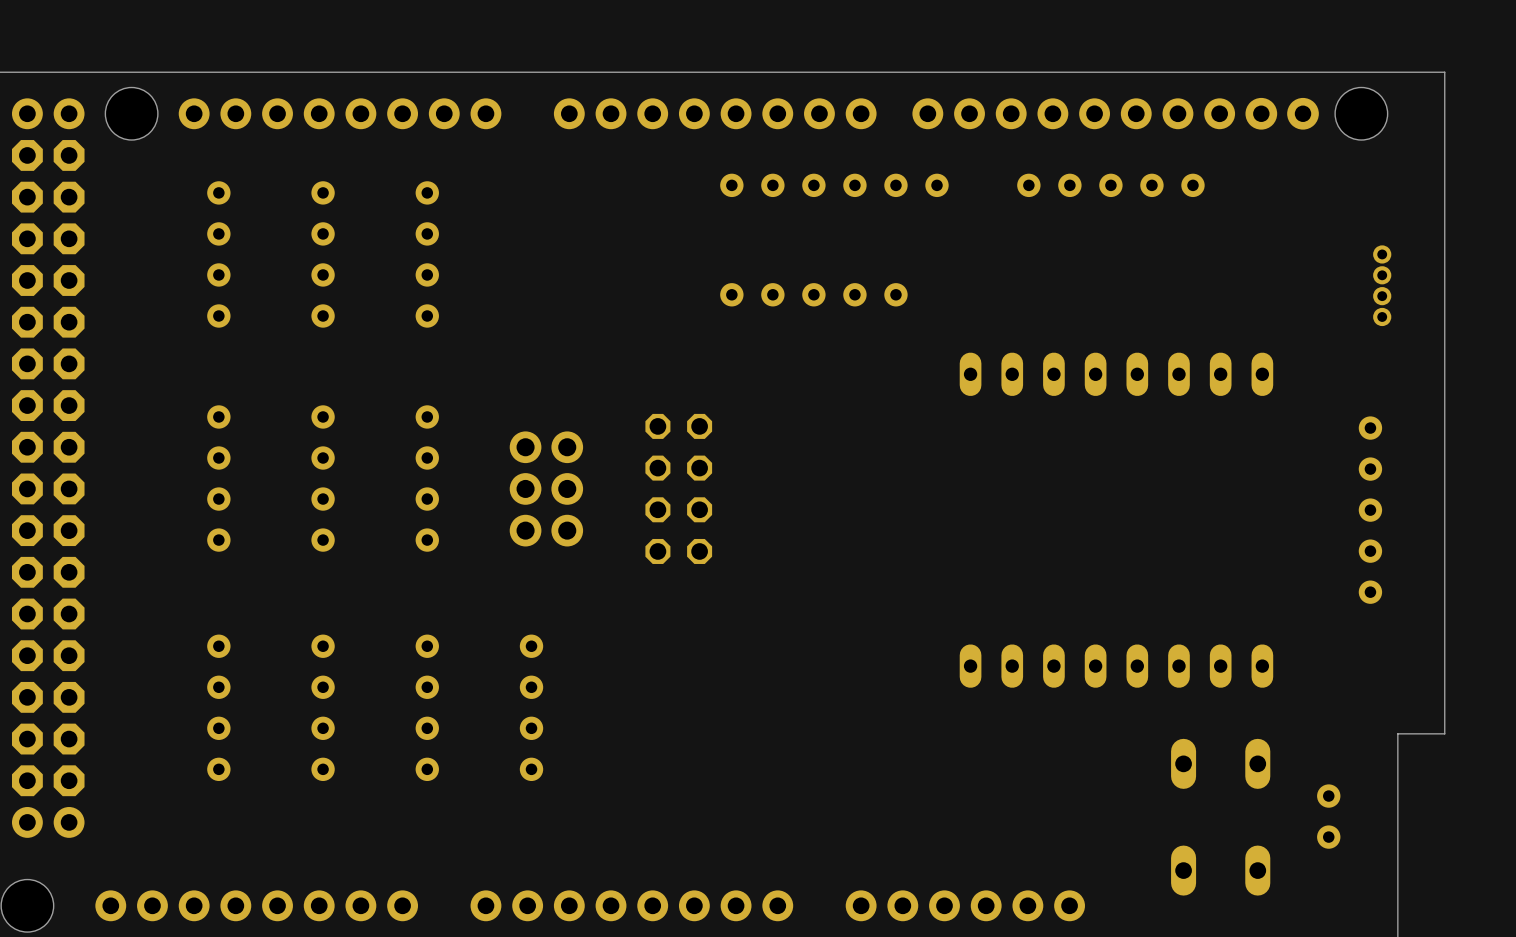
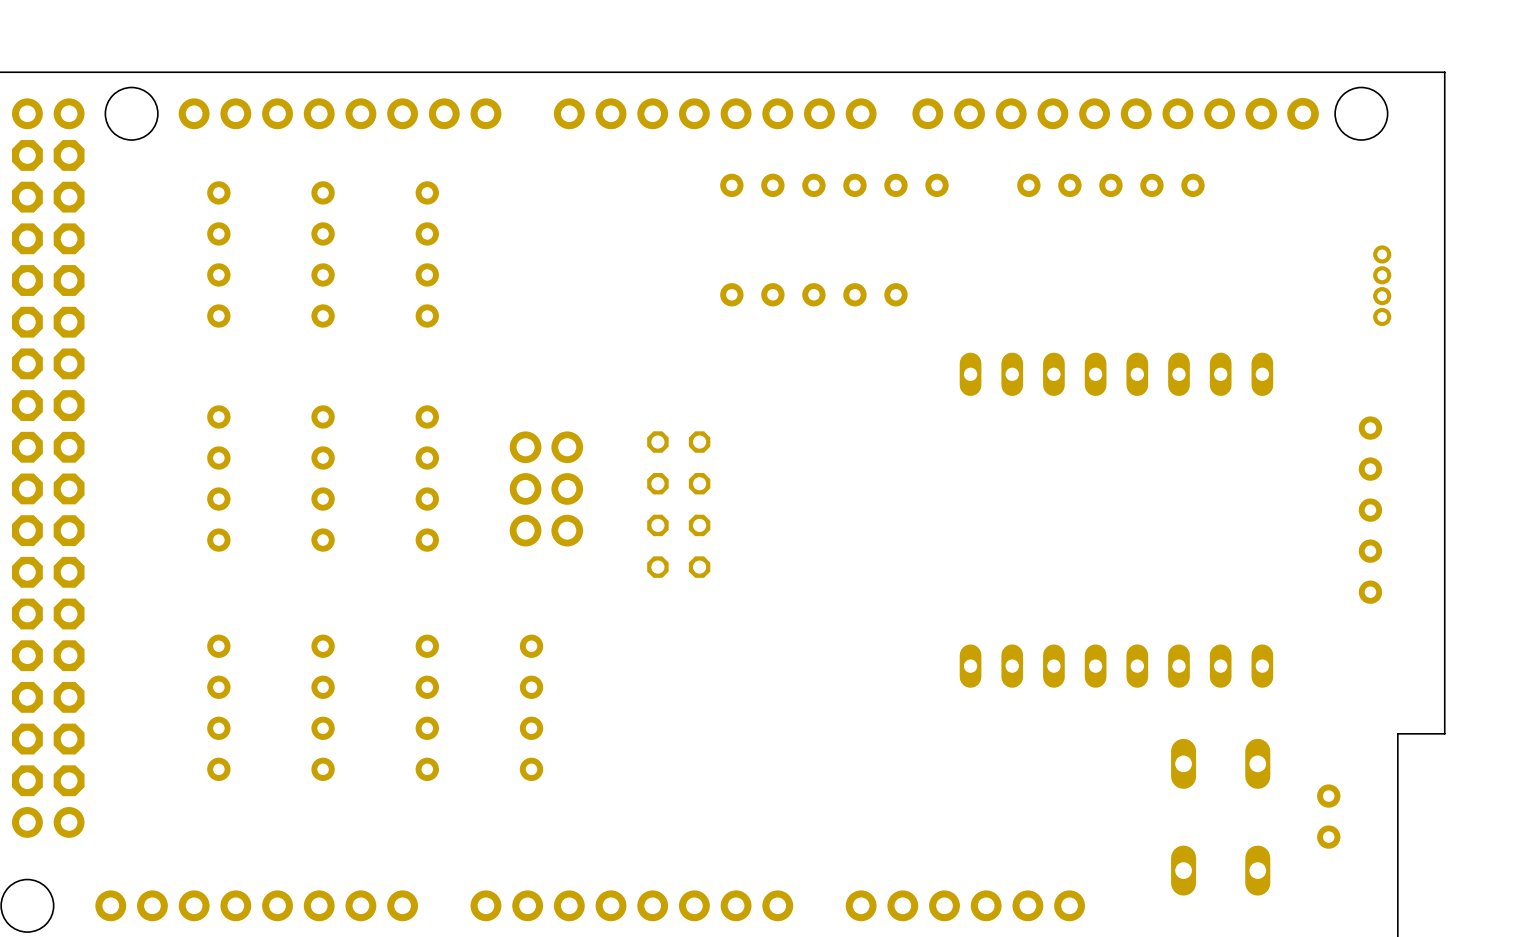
part footprint: [645, 413, 713, 564] -> [647, 431, 711, 578]

